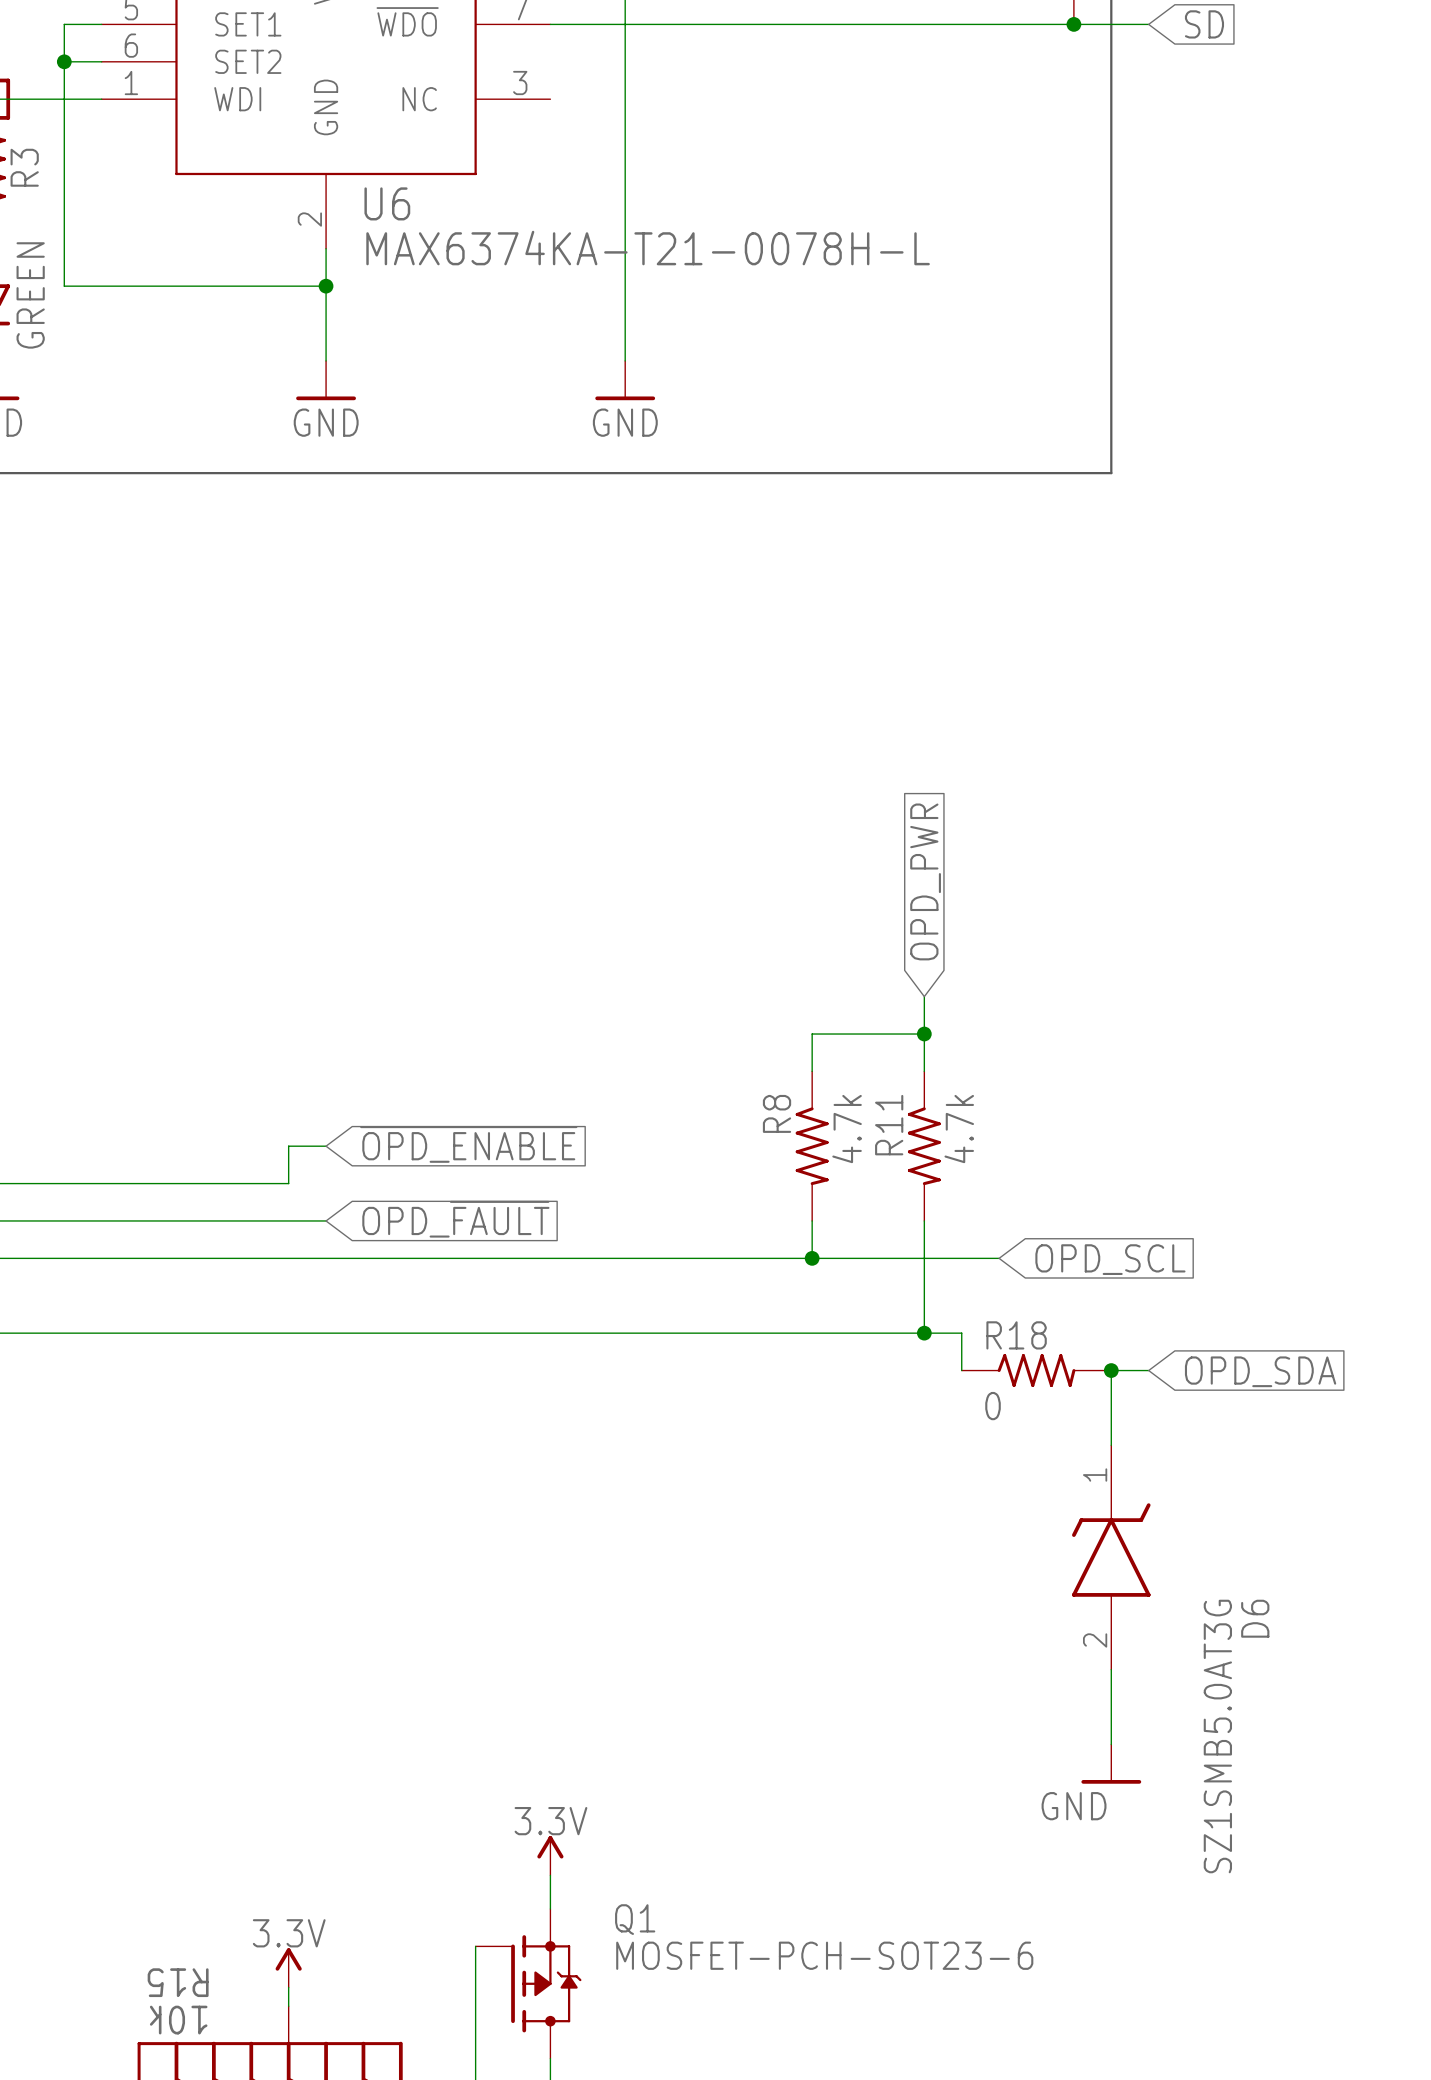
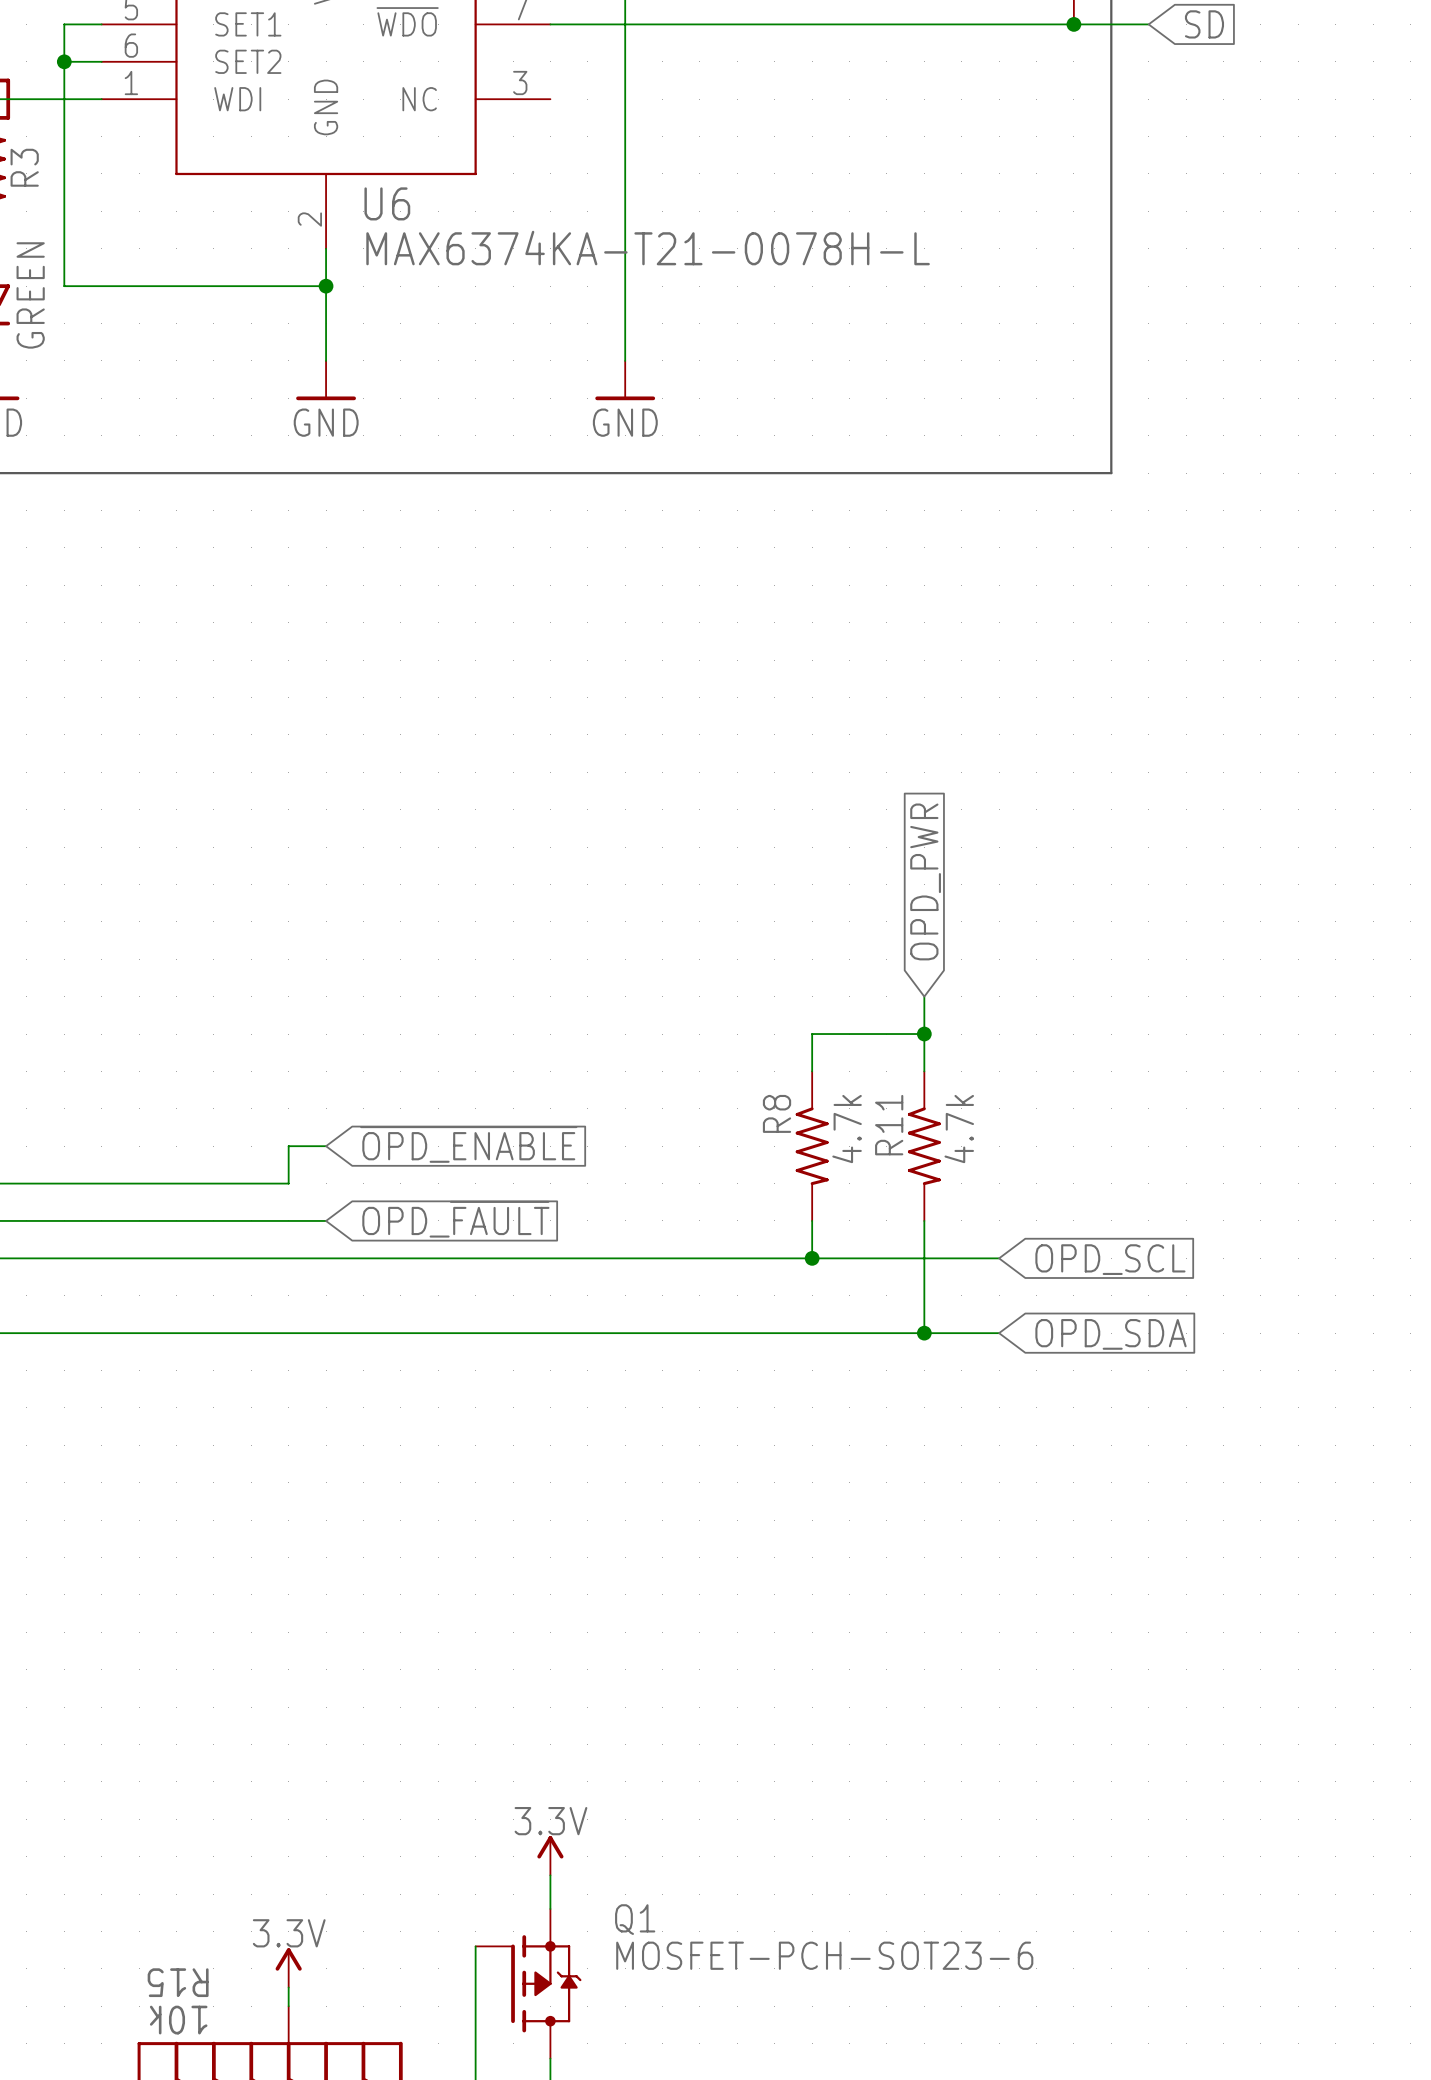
wire: (961, 1333) (961, 1370) -> (961, 1333) (999, 1333)
R18: 0 (1036, 1370) -> none
junction: (1111, 1370) -> none
wire: (1148, 1370) (1111, 1370) (1111, 1445) -> none
global label position: OPD_SDA (1260, 1371) -> OPD_SDA (1110, 1334)
D6: SZ1SMB5.0AT3G (1111, 1557) -> none
wire: (1111, 1669) (1111, 1744) -> none
power symbol: GND (1111, 1764) -> none

